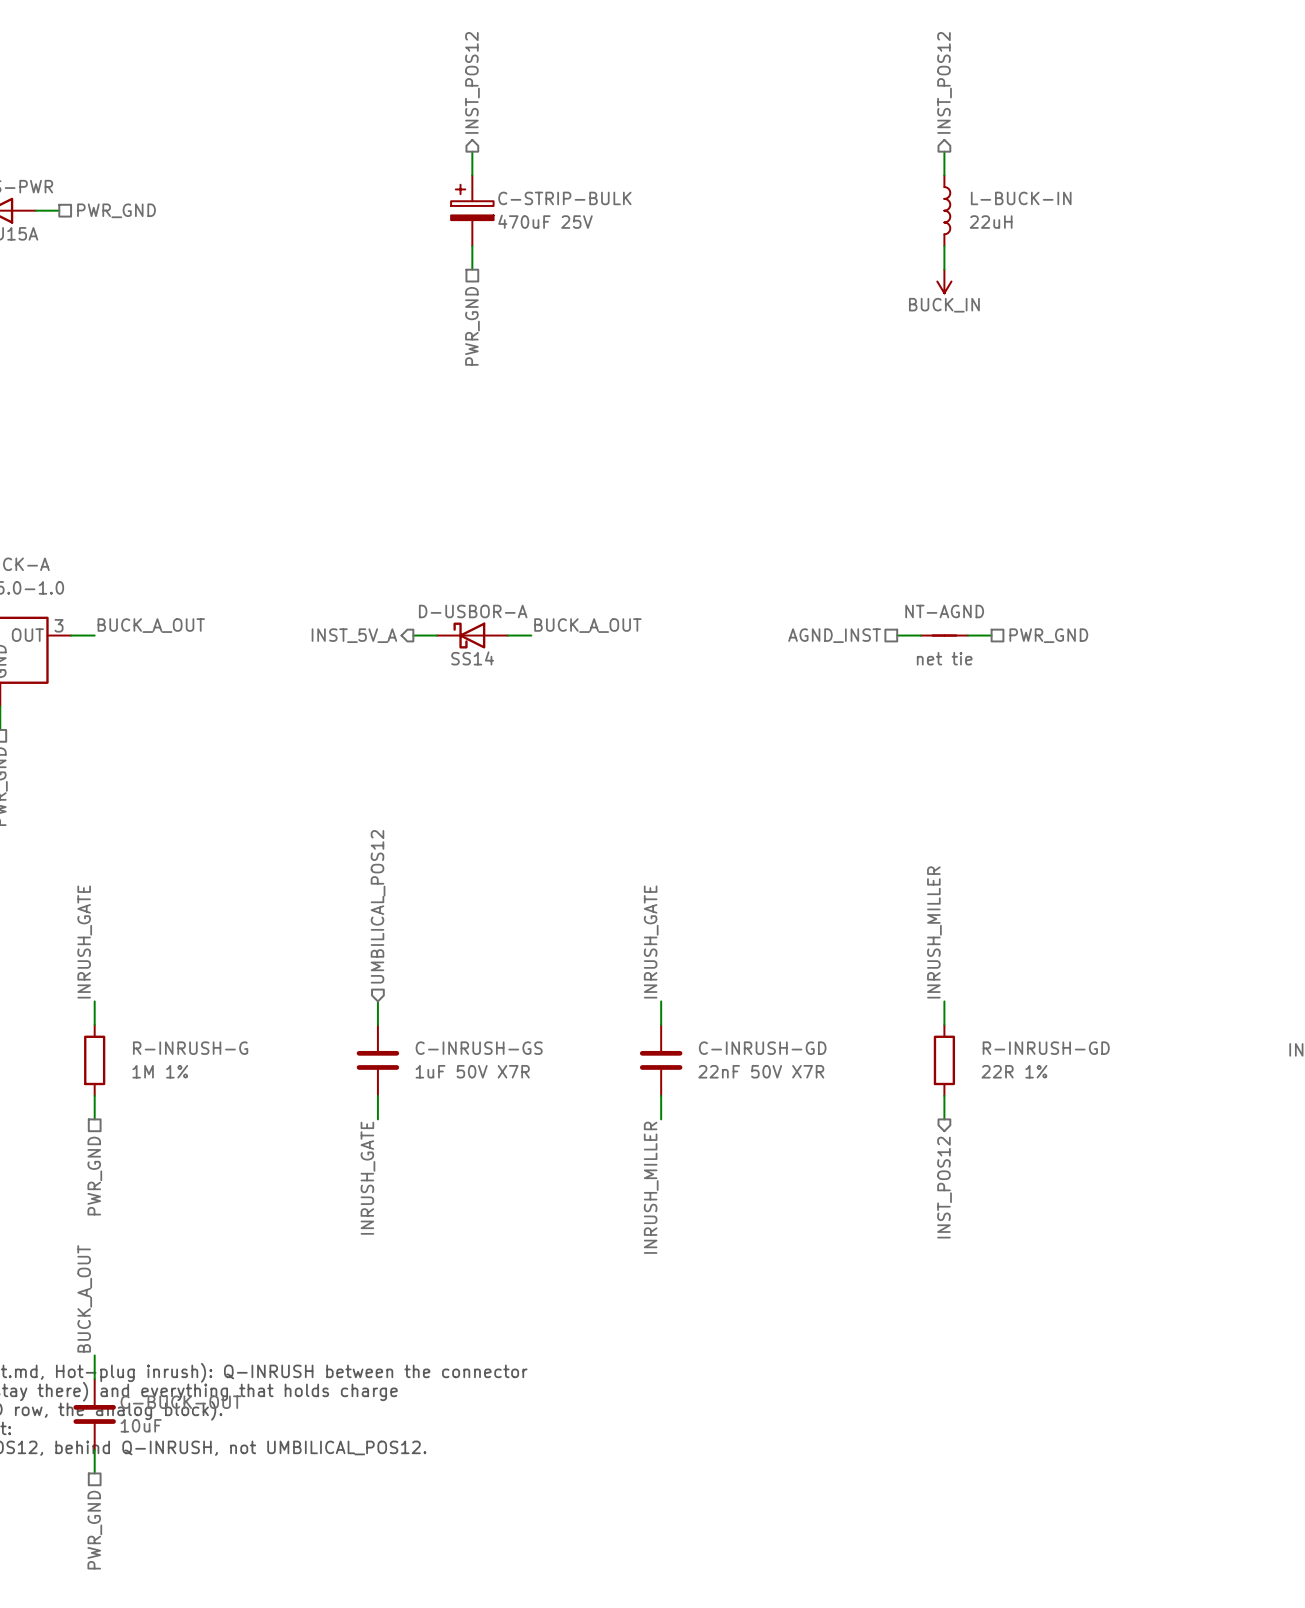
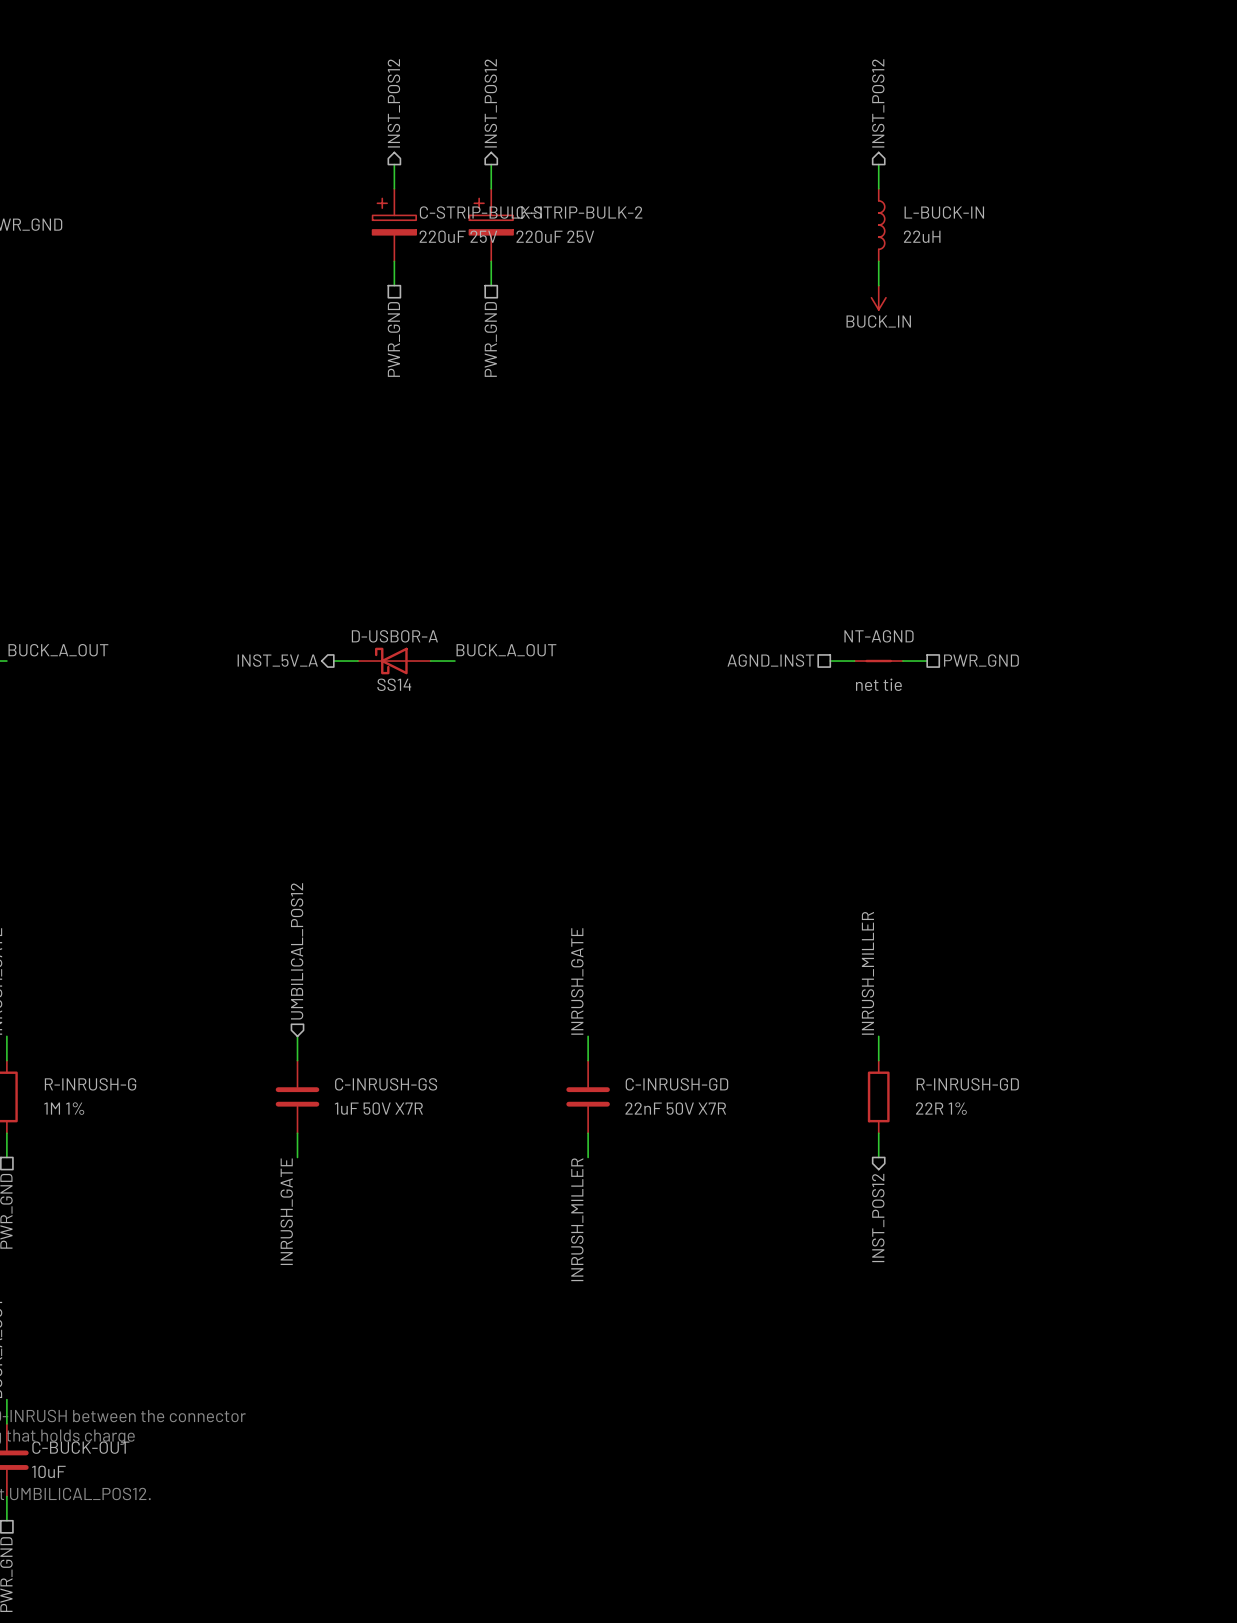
hierarchical label: none -> INST_POS12 (490, 103)
wire: none -> (491, 164) (491, 188)
C-STRIP-BULK name: C-STRIP-BULK (564, 198) -> C-STRIP-BULK-1 (480, 212)
C-STRIP-BULK-2: none -> 220uF 25V (491, 225)
C-STRIP-BULK value: 470uF 25V (545, 221) -> 220uF 25V (458, 236)
wire: none -> (491, 261) (491, 285)
hierarchical label: none -> PWR_GND (490, 339)

